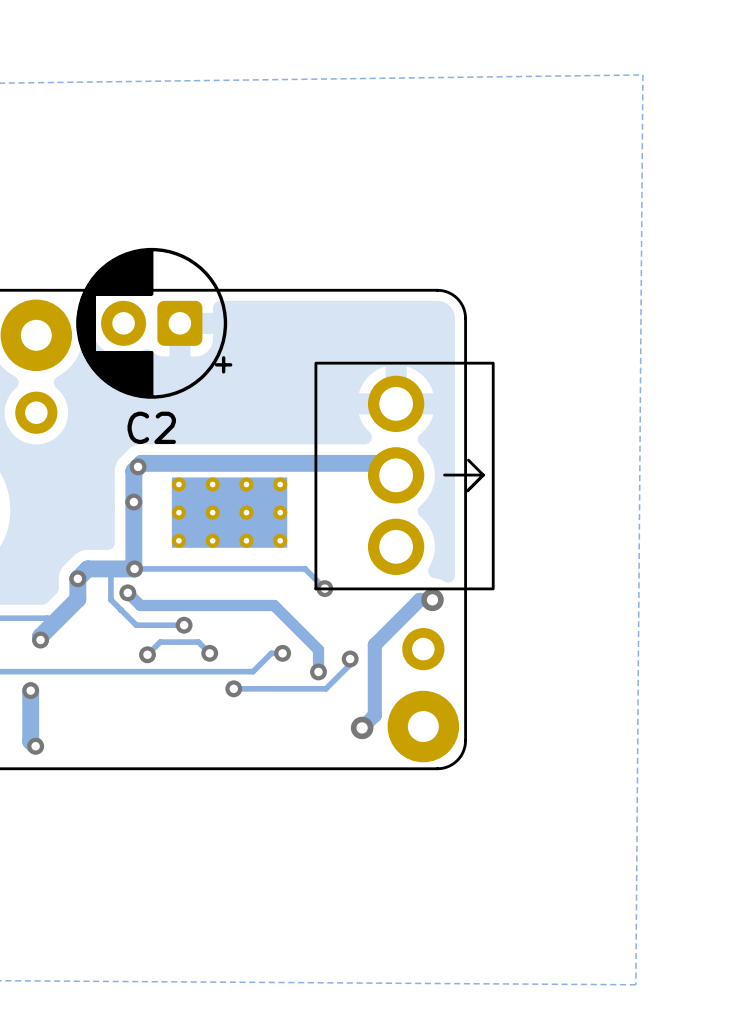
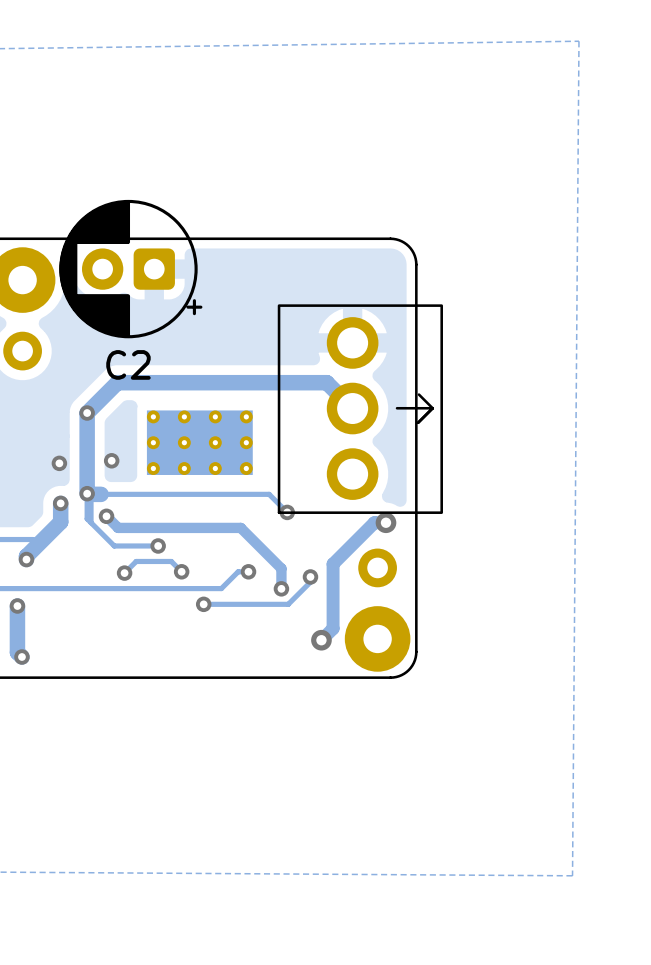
track: (384, 463) (141, 463) (133, 471) (134, 568) (127, 568) -> (341, 397) (326, 382) (117, 382) (87, 413) (87, 518) (91, 522)
via: (138, 466) -> none
via: none -> (87, 413)
via: (133, 502) -> none
via: none -> (111, 460)
via: none -> (59, 463)
track: (106, 568) (87, 568) (77, 578) -> none
via: none -> (87, 493)
via: (134, 568) -> none

